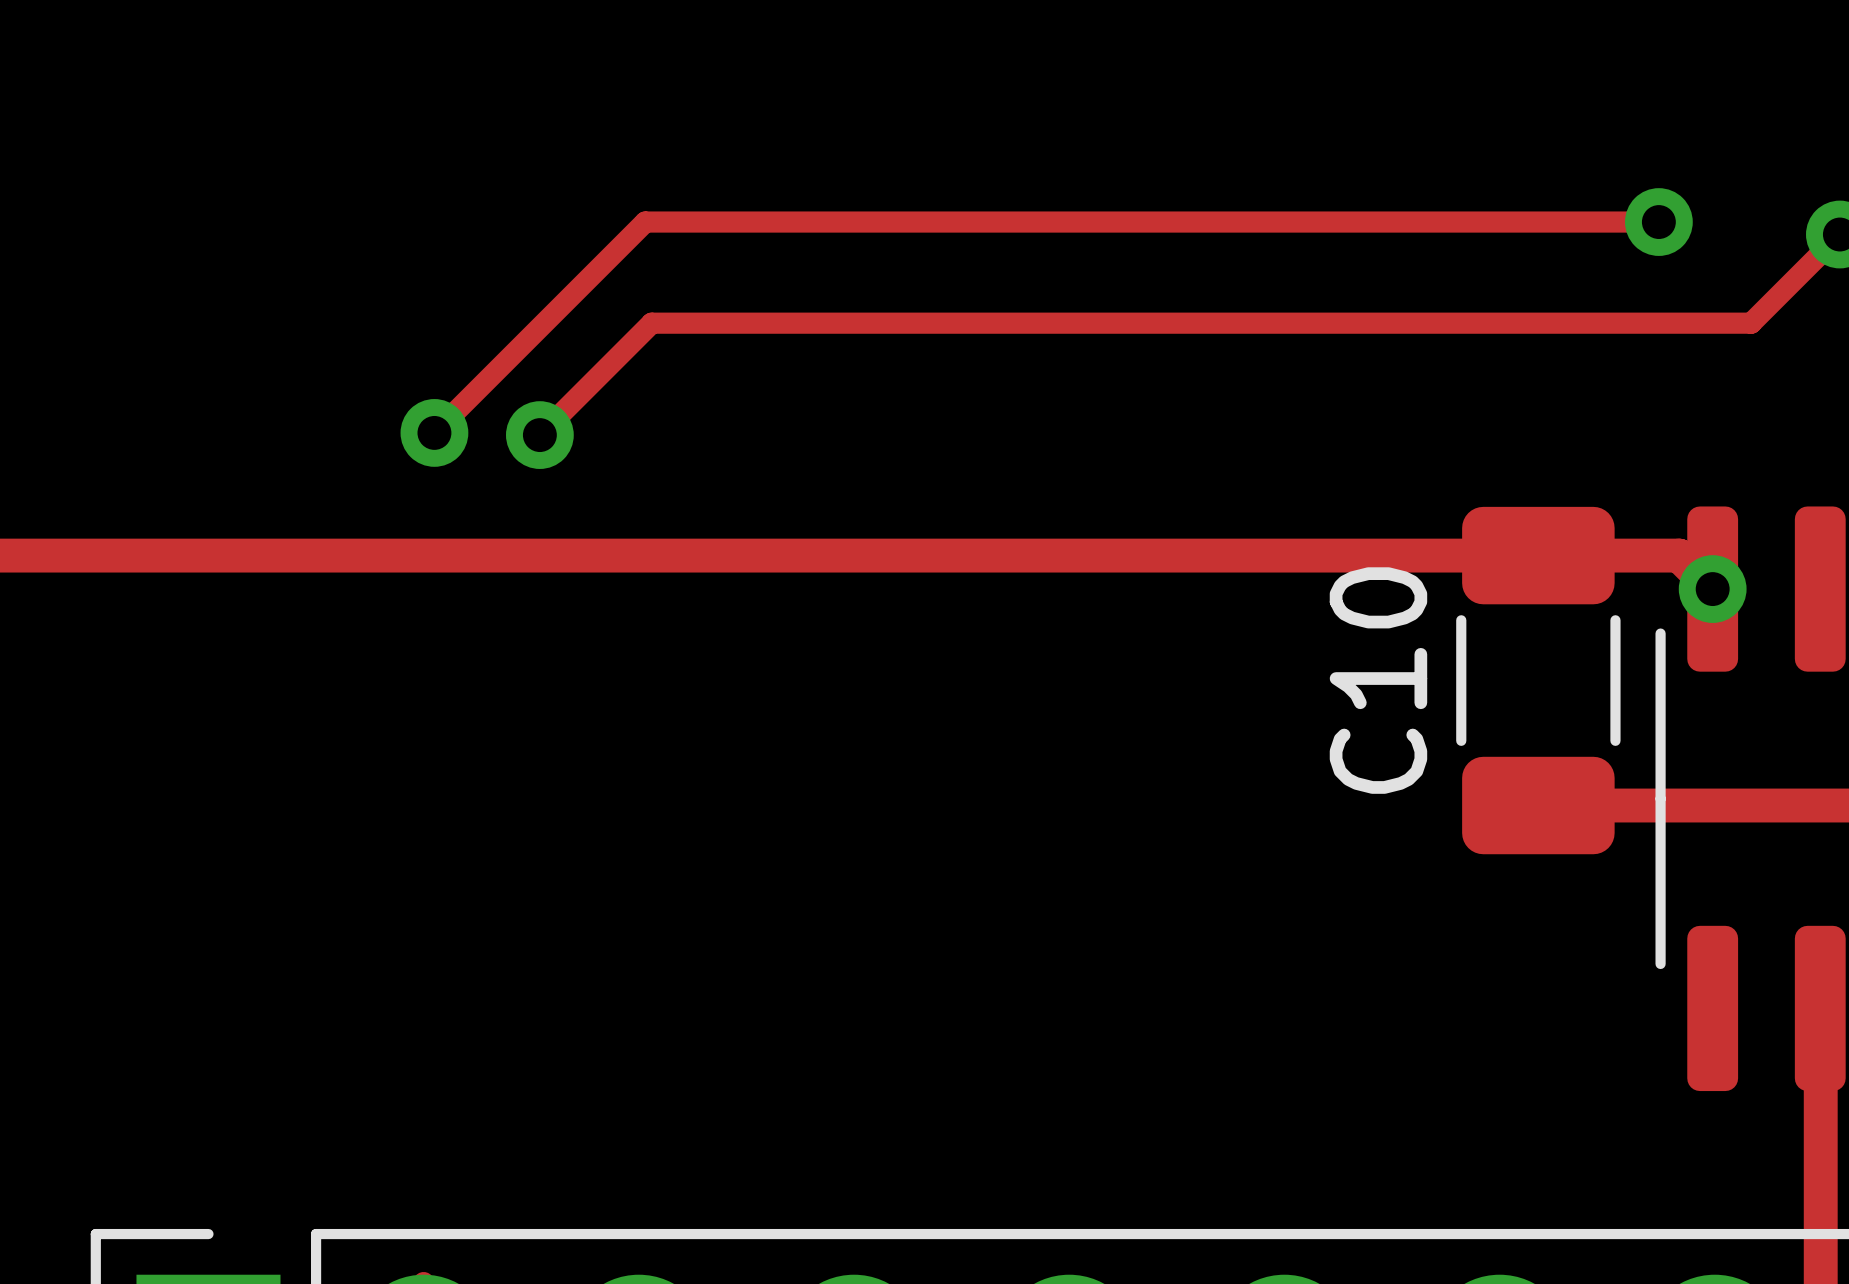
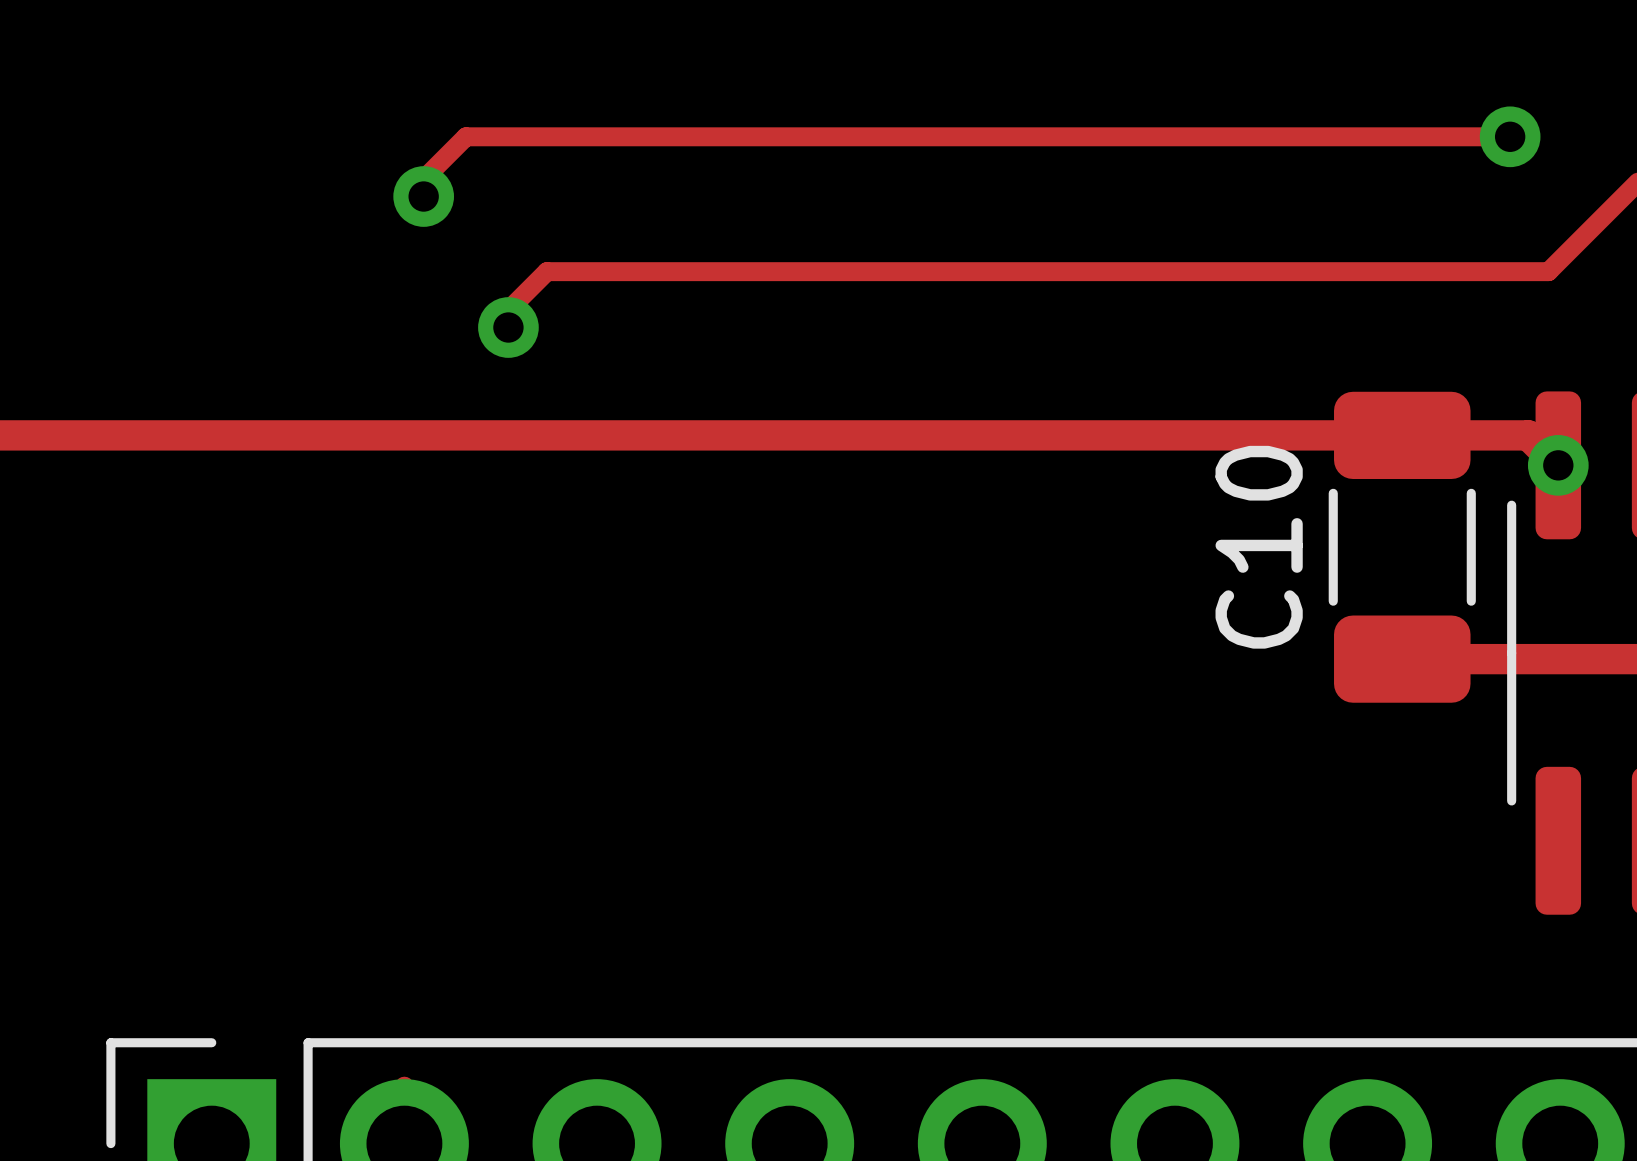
track: (645, 222) (434, 432) -> (602, 136) (466, 136) (423, 179) (423, 196)
track: (1751, 323) (651, 323) (539, 435) -> (1592, 227) (1548, 271) (546, 271) (507, 310) (507, 328)
via position: (434, 432) -> (423, 196)

